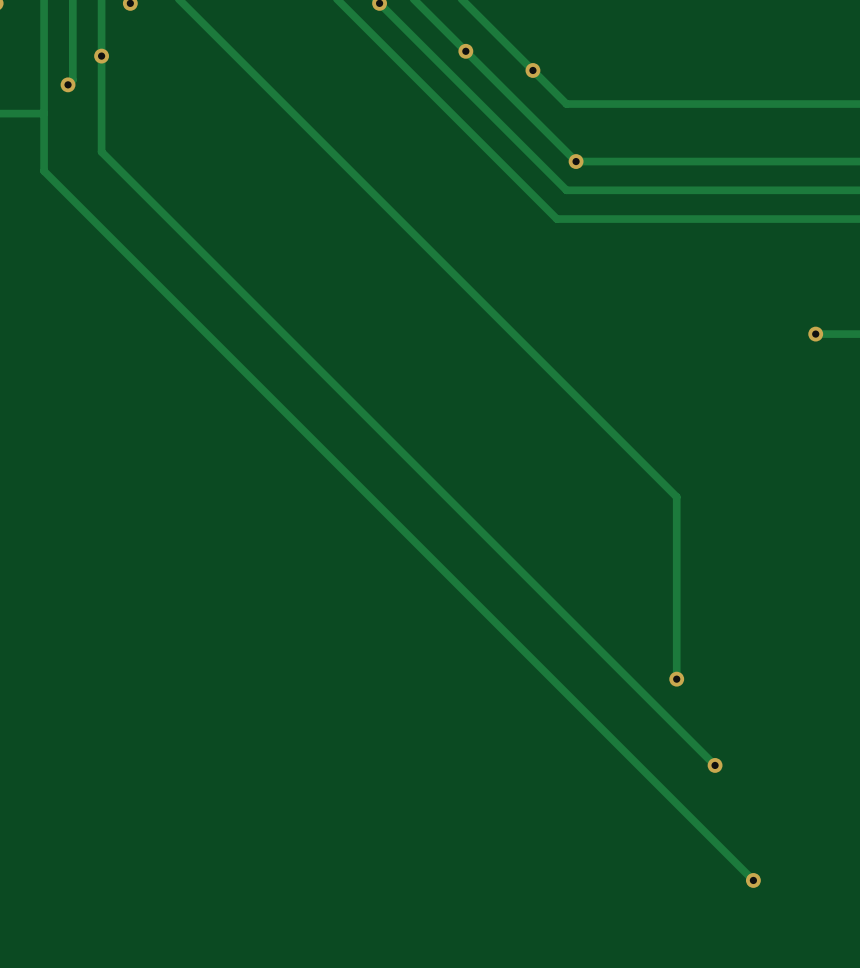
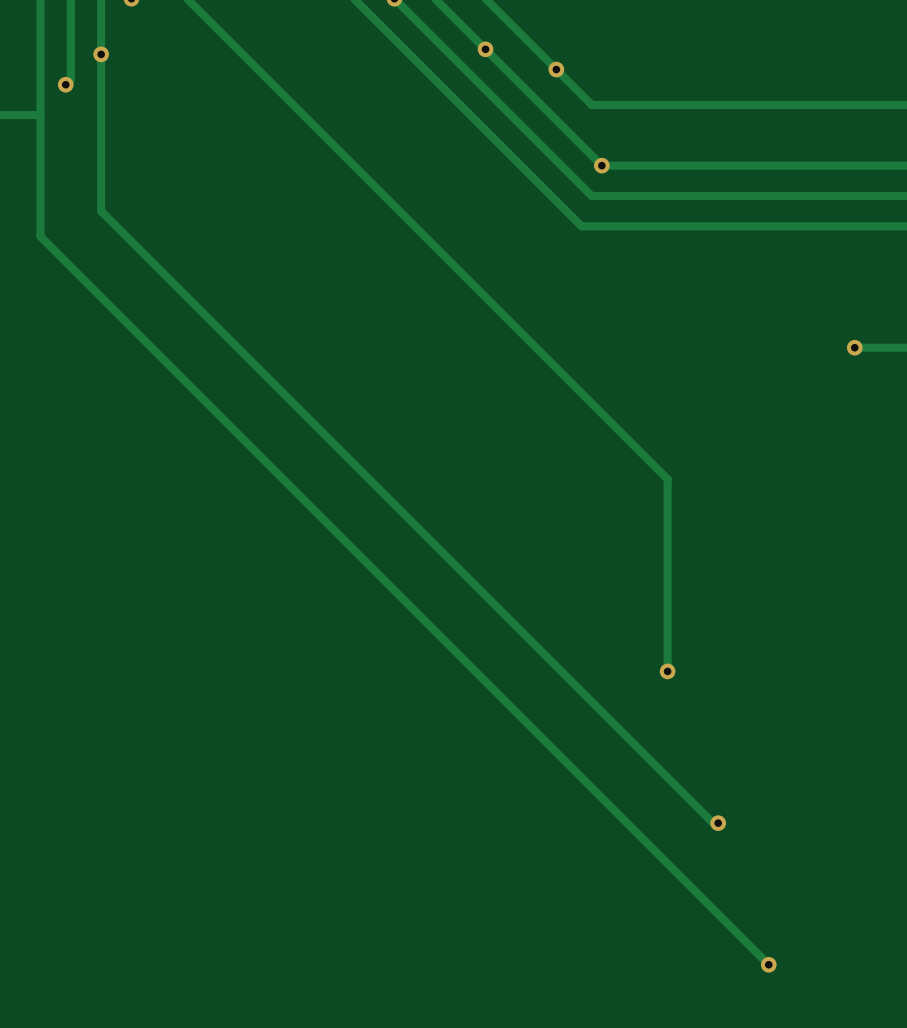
track: (101, 151) (715, 765) -> (101, 155) (101, 211) (713, 823) (718, 823)
track: (44, 171) (753, 880) -> (40, 175) (40, 236) (768, 964)
track: (638, 458) (676, 497) (676, 679) -> (667, 479) (667, 671)
via: none -> (667, 671)
via: (676, 679) -> none
via position: (715, 765) -> (718, 823)
via position: (753, 880) -> (768, 964)

